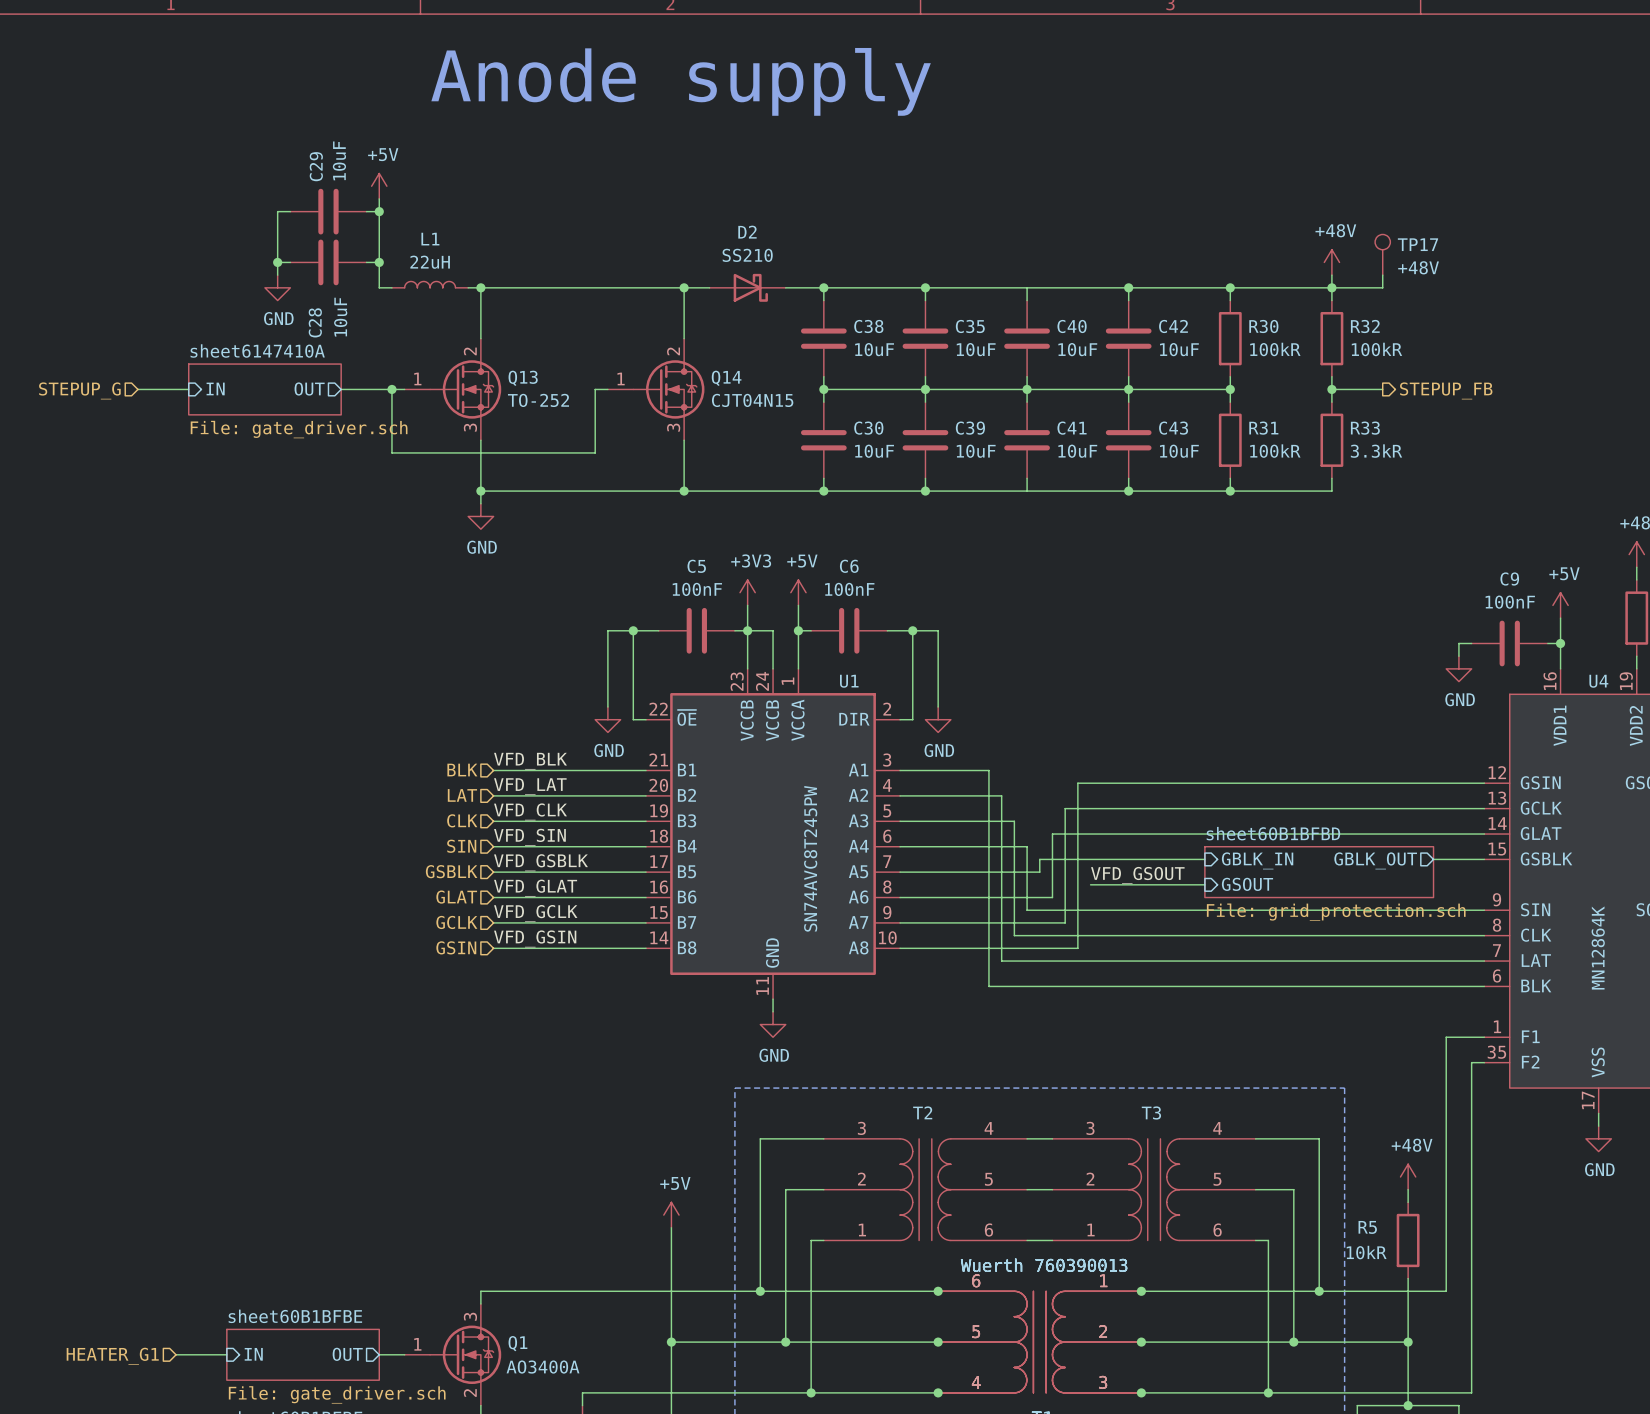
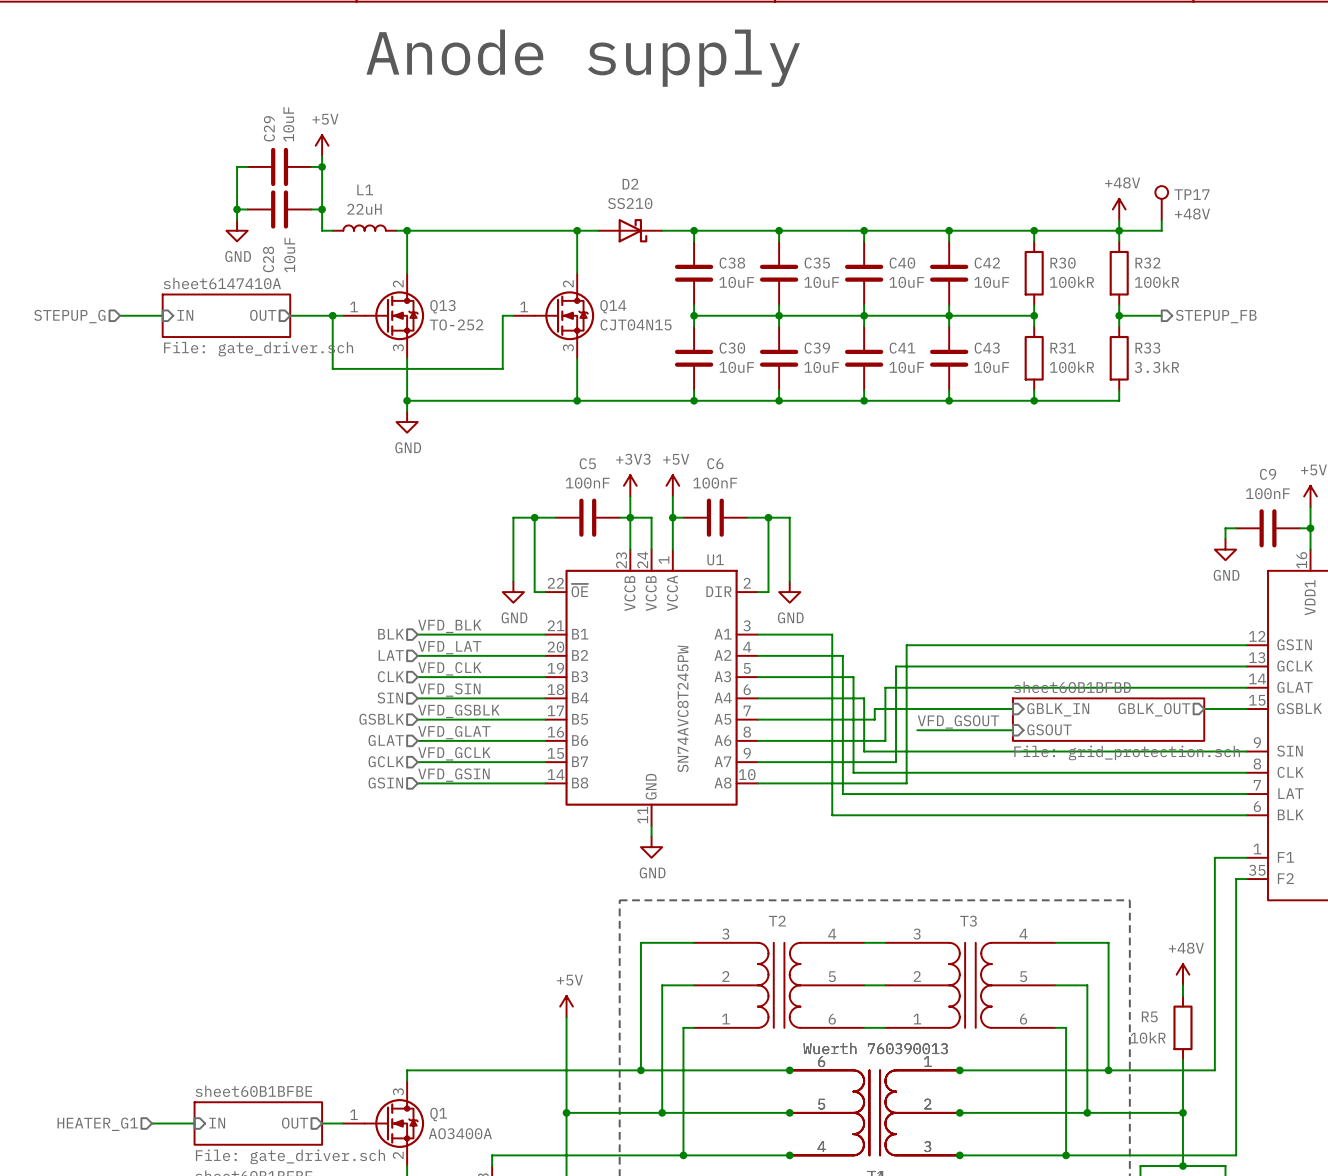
junction: none -> (864, 230)
junction: none -> (864, 400)

